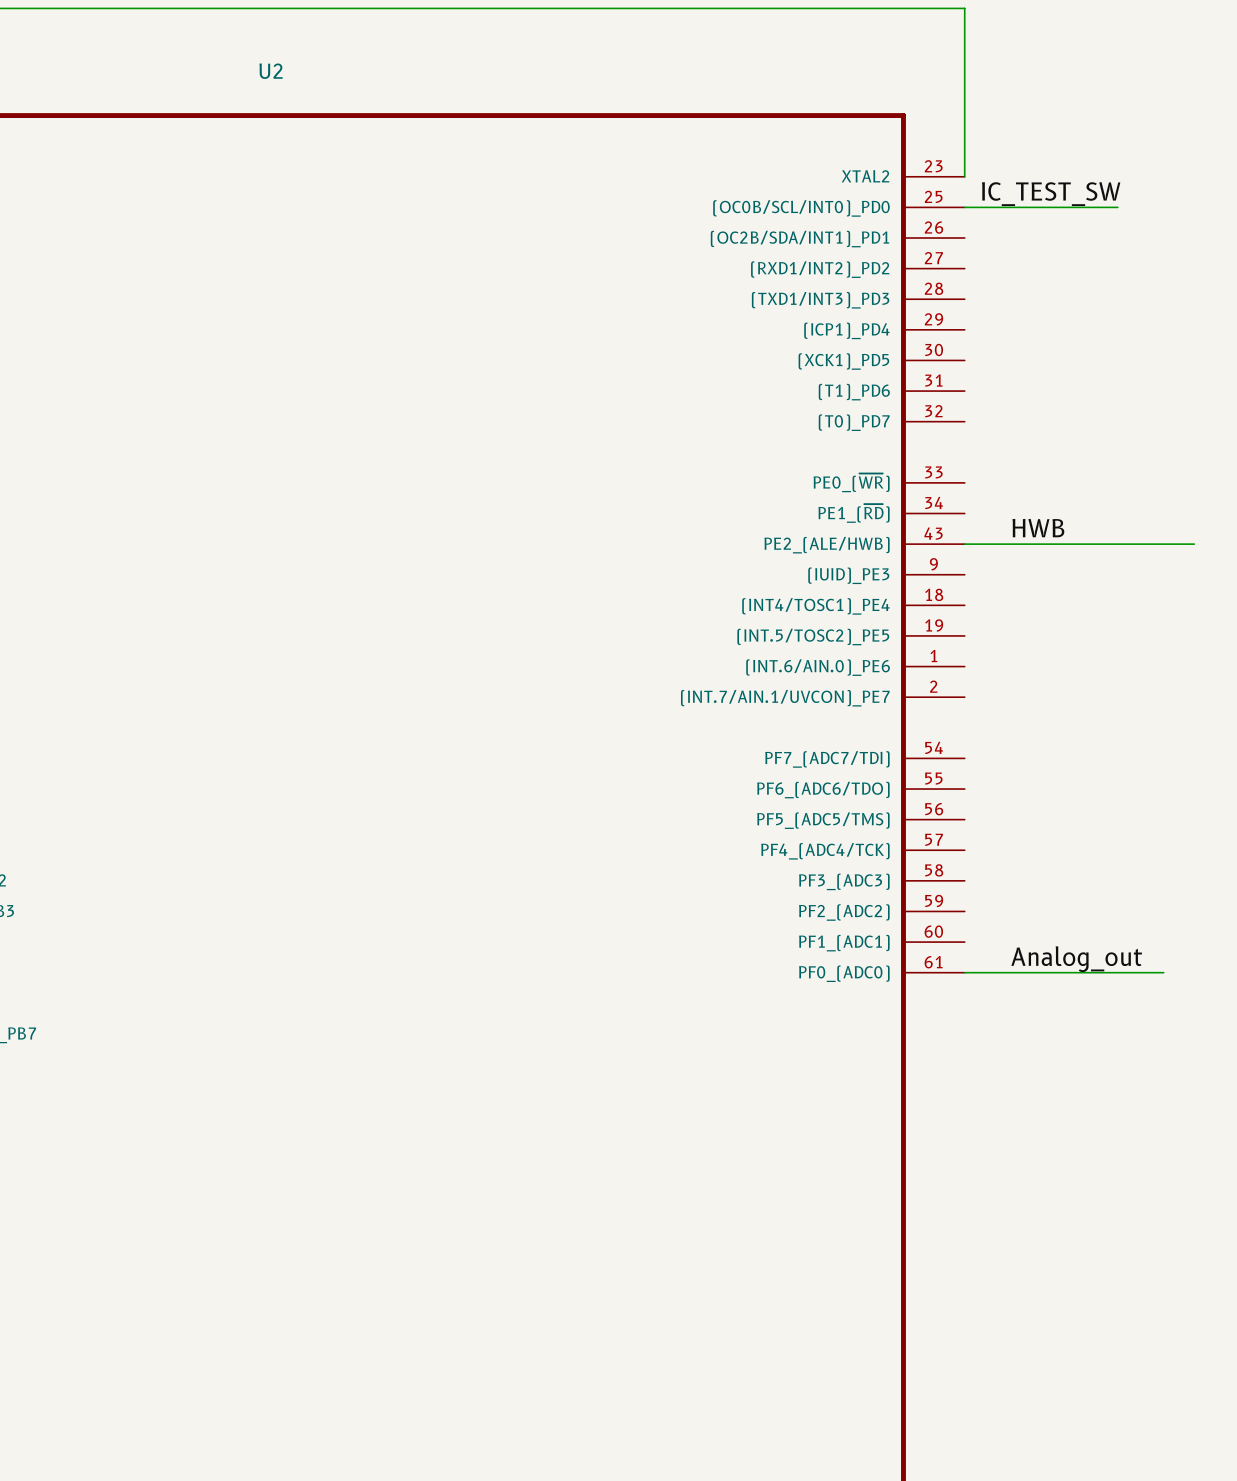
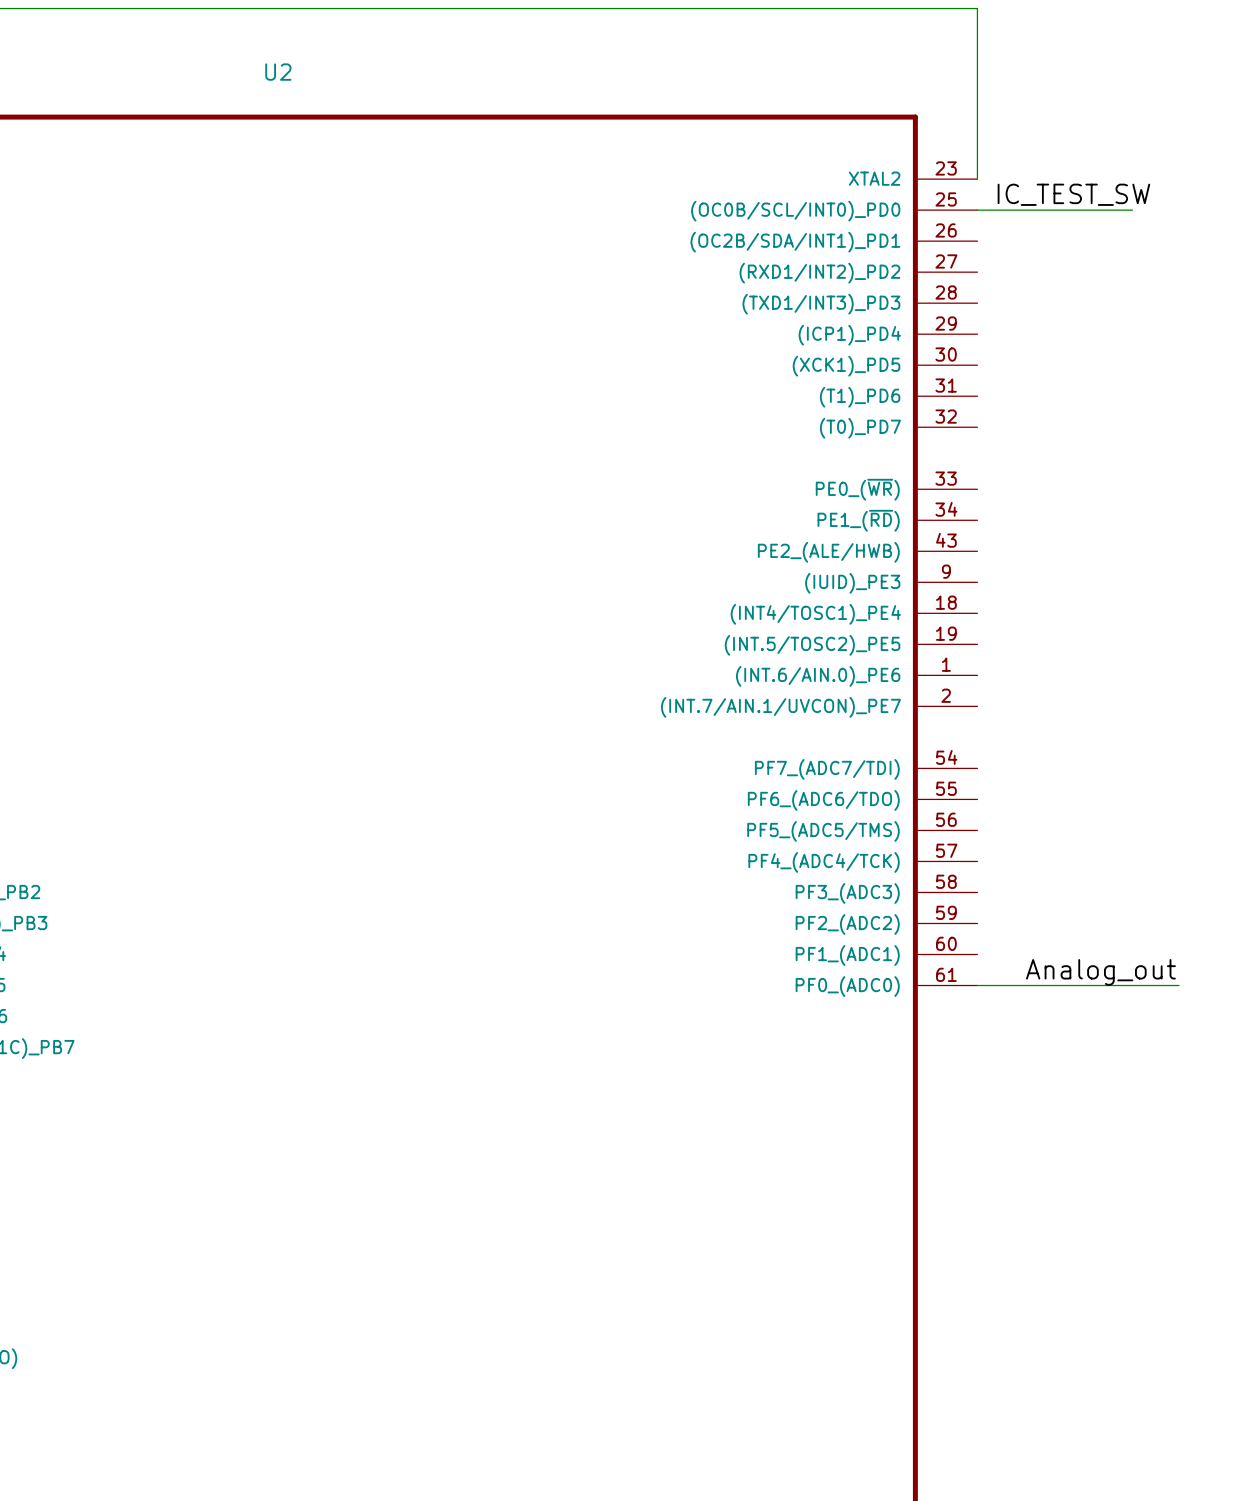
label: HWB (1038, 528) -> none
wire: (964, 544) (1194, 544) -> none

